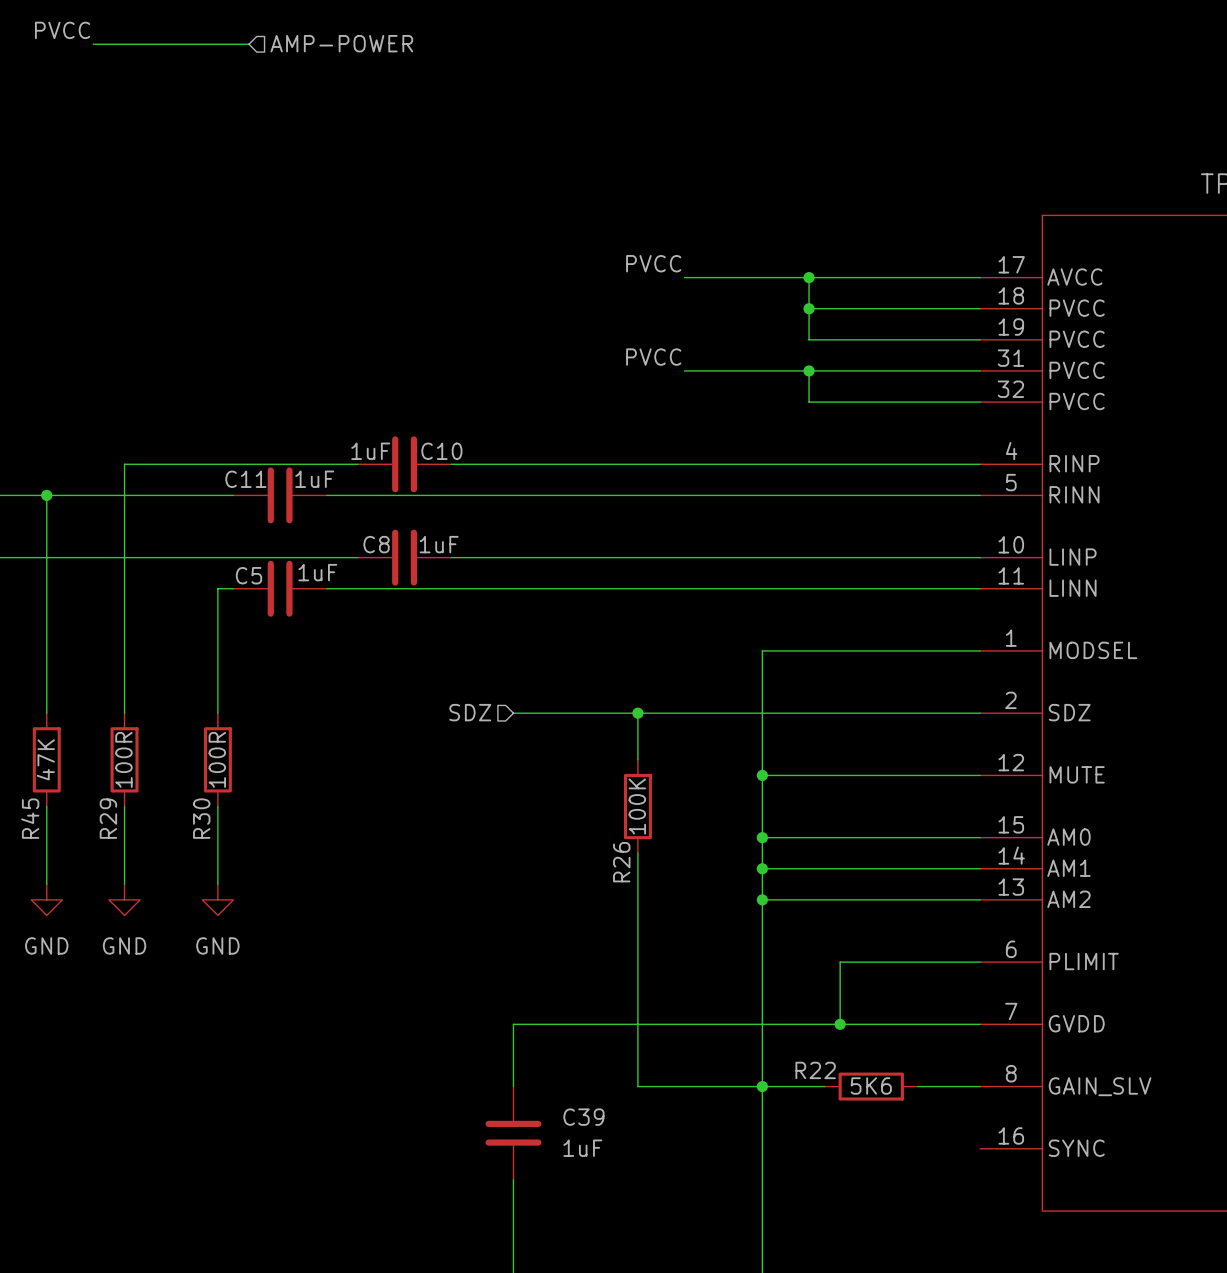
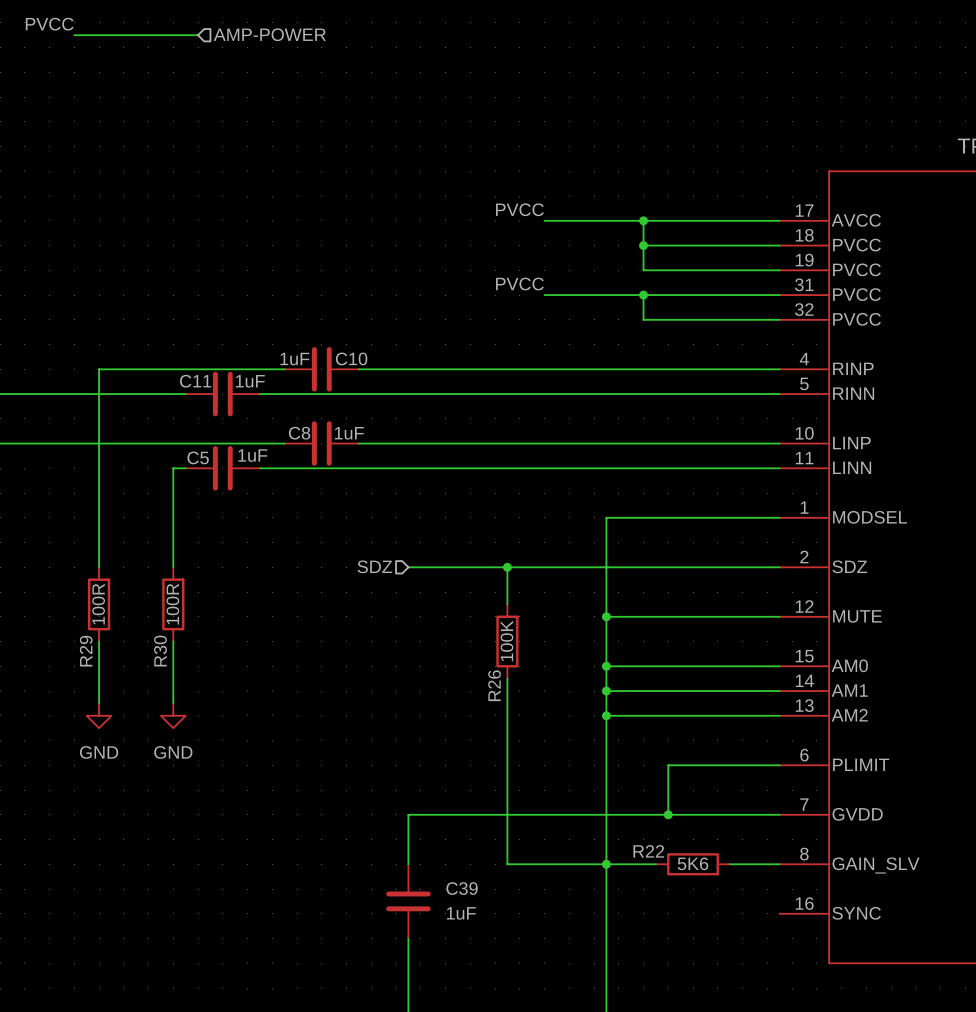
wire: (46, 495) (46, 713) -> none
junction: (46, 495) -> none
R45: 47K (46, 759) -> none
wire: (46, 806) (46, 884) -> none
power symbol: GND (46, 899) -> none

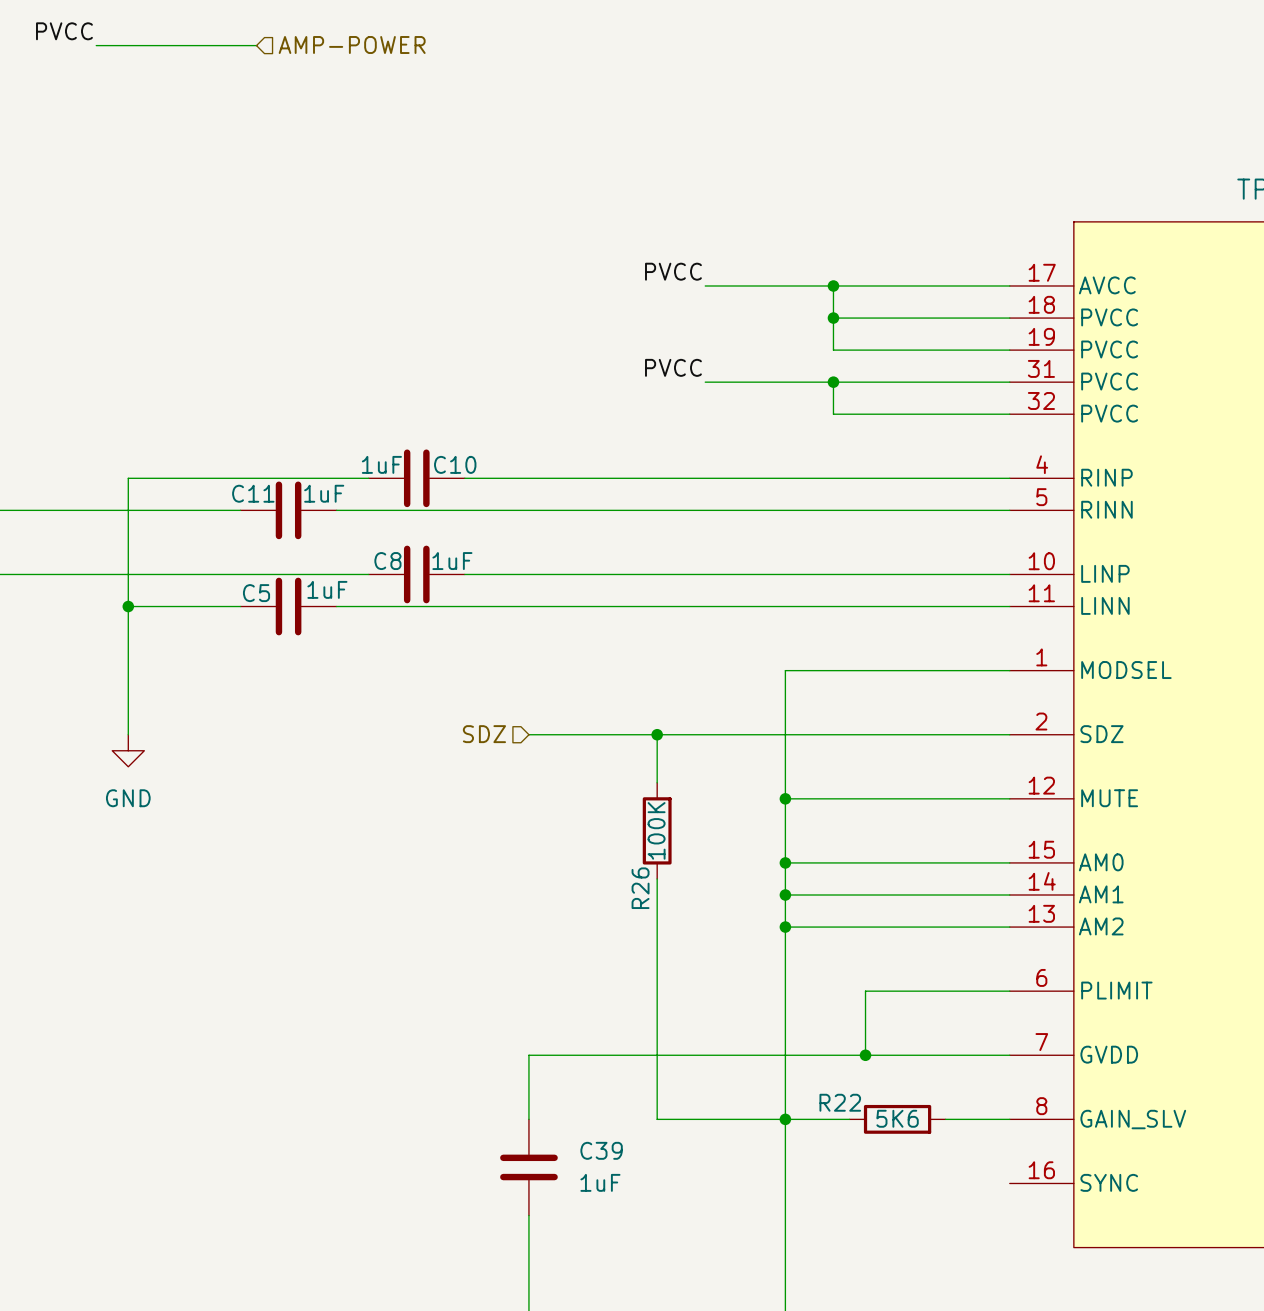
junction: none -> (128, 606)
wire: (173, 468) (173, 567) -> (224, 606) (128, 606)
power symbol: none -> GND (128, 750)
R29: 100R (99, 604) -> none
R30: 100R (173, 604) -> none
wire: (99, 641) (99, 703) -> none
wire: (173, 641) (173, 703) -> none
power symbol: GND (99, 715) -> none
power symbol: GND (173, 715) -> none

